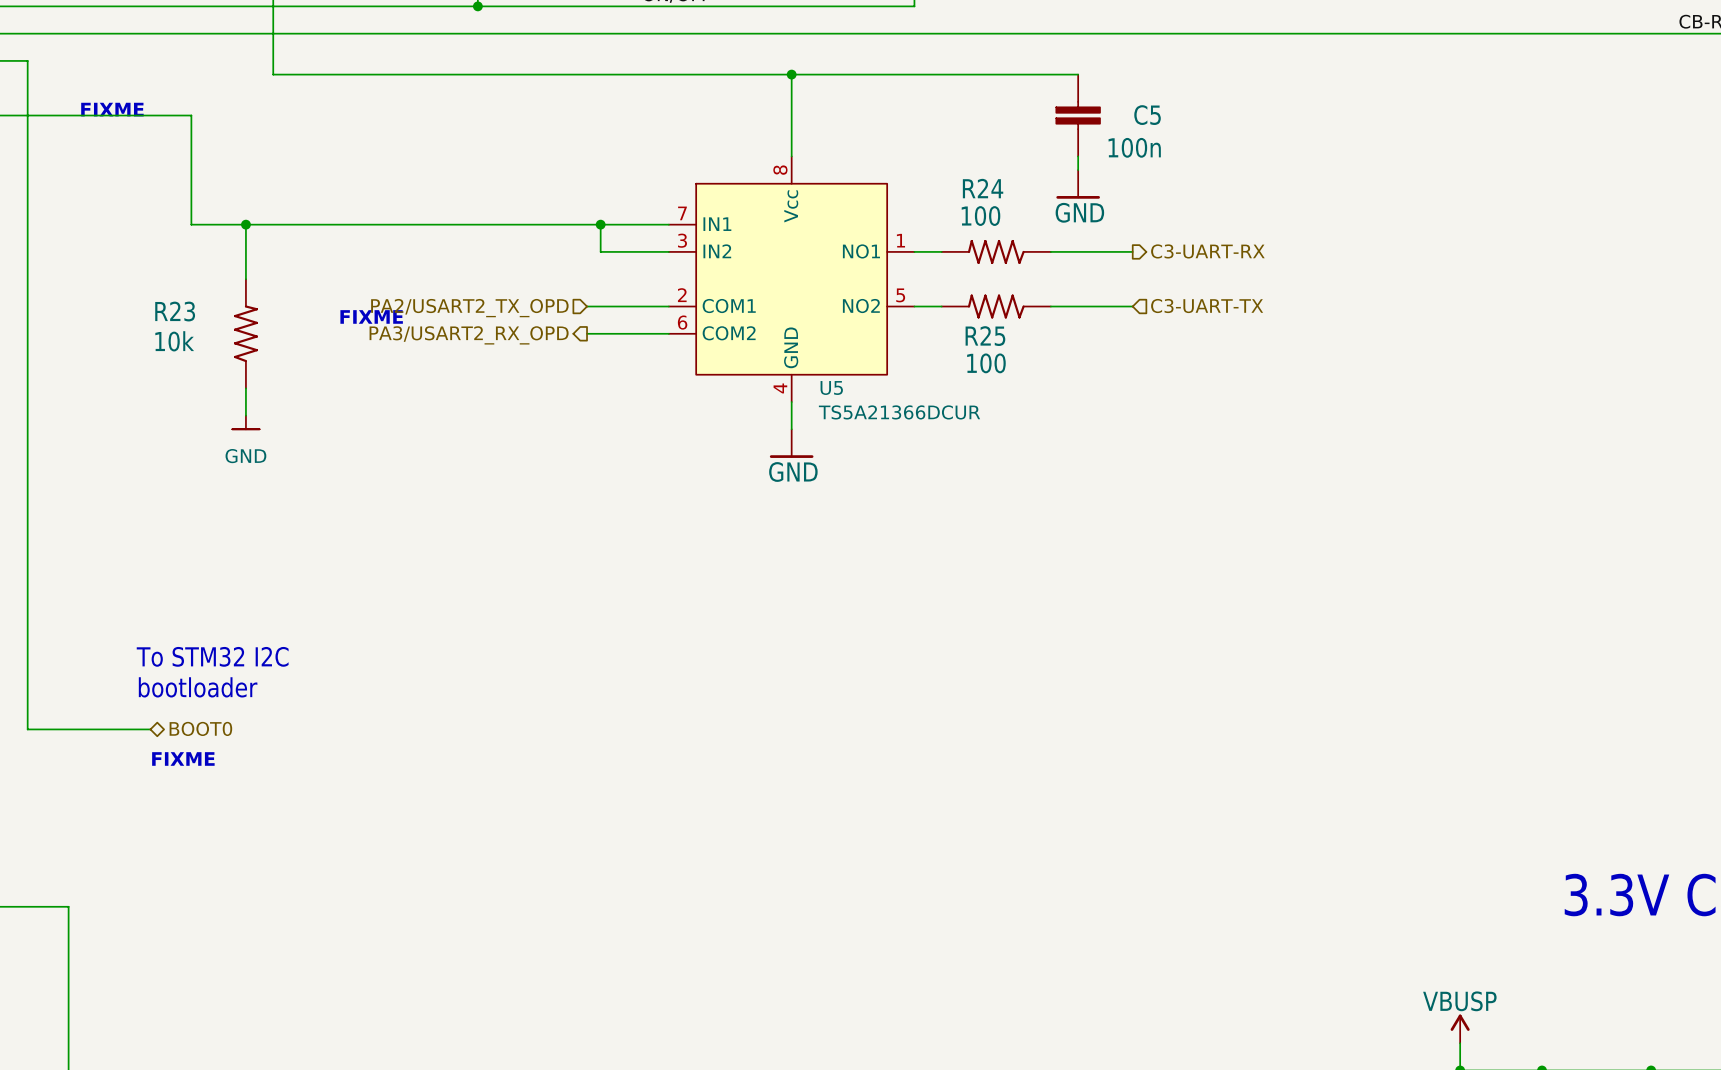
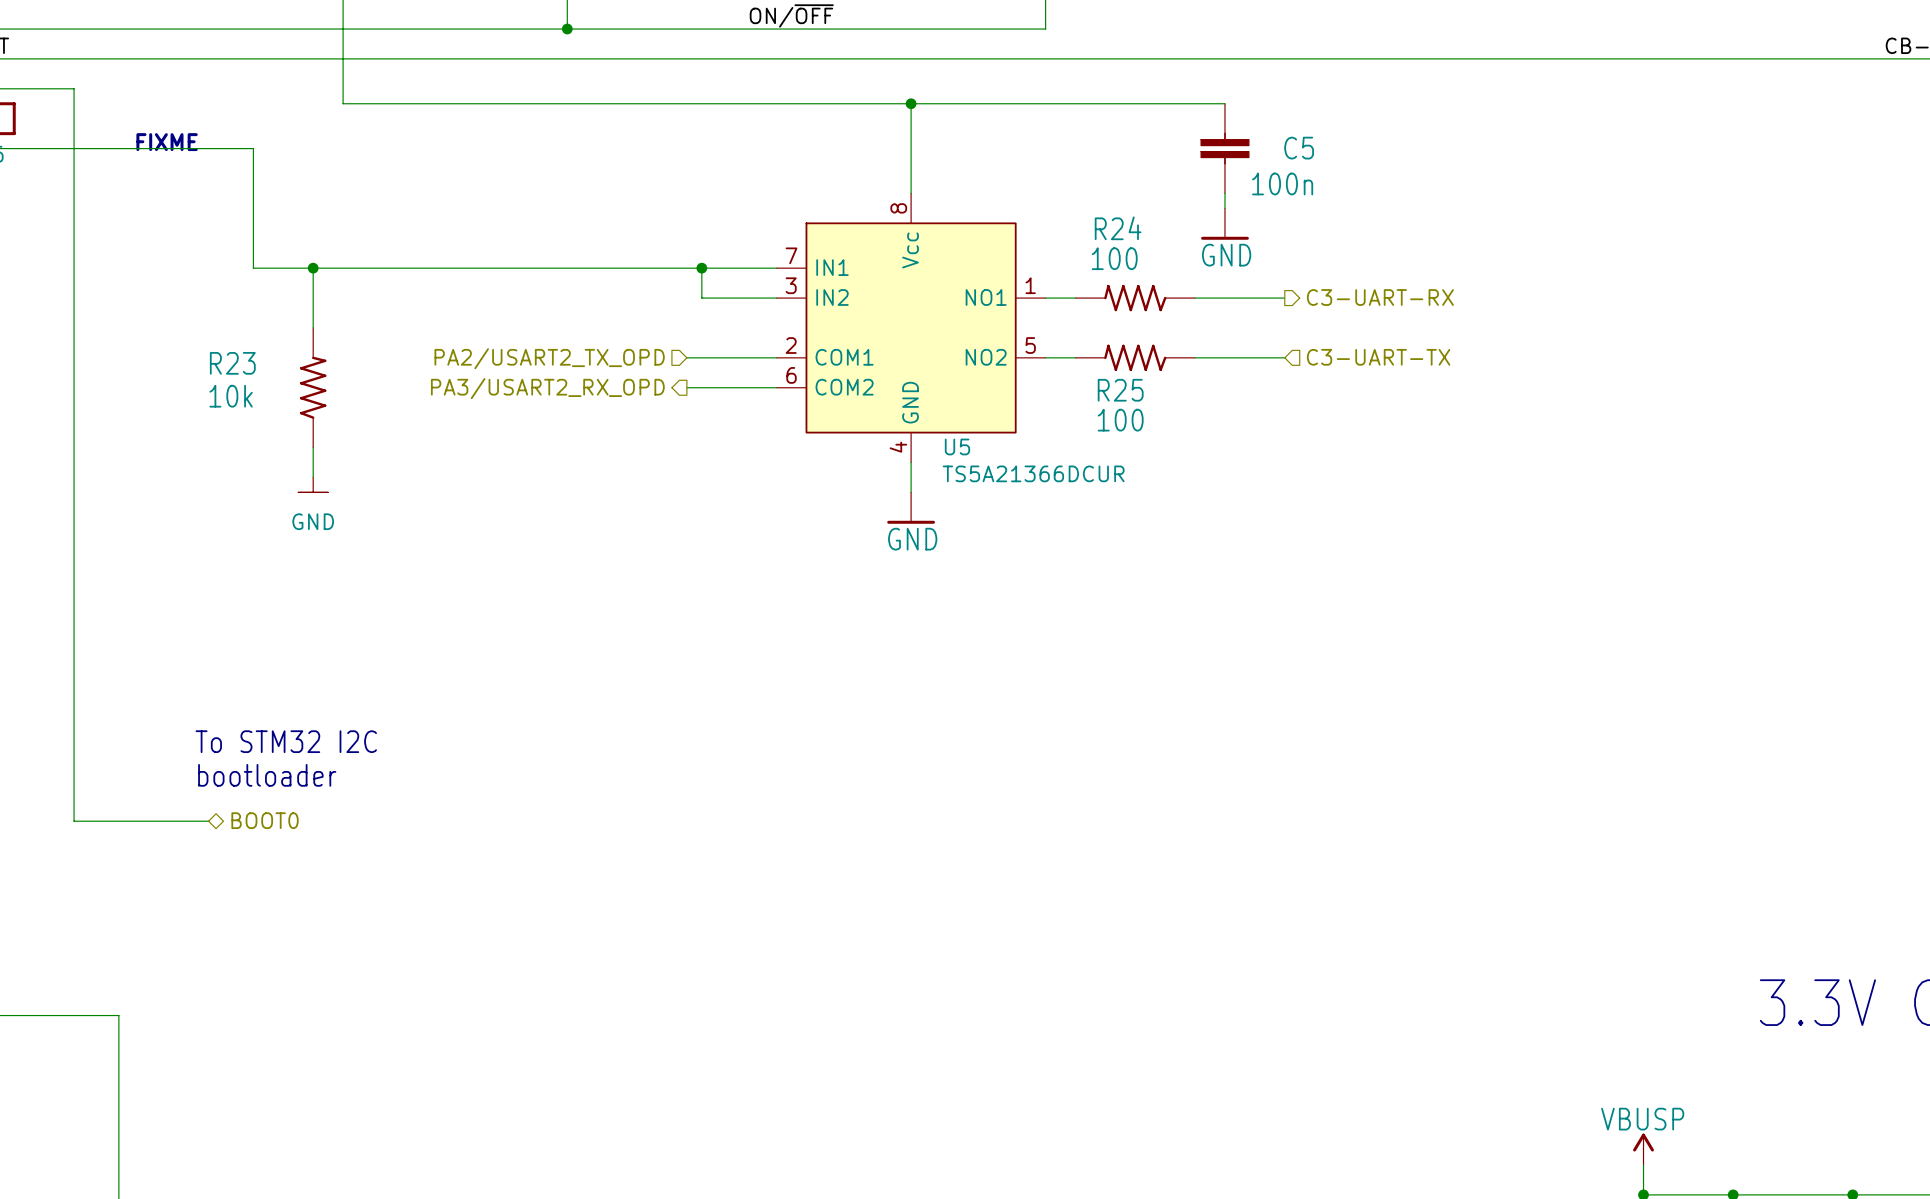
text: FIXME (371, 316) -> none
text: FIXME (183, 758) -> none

